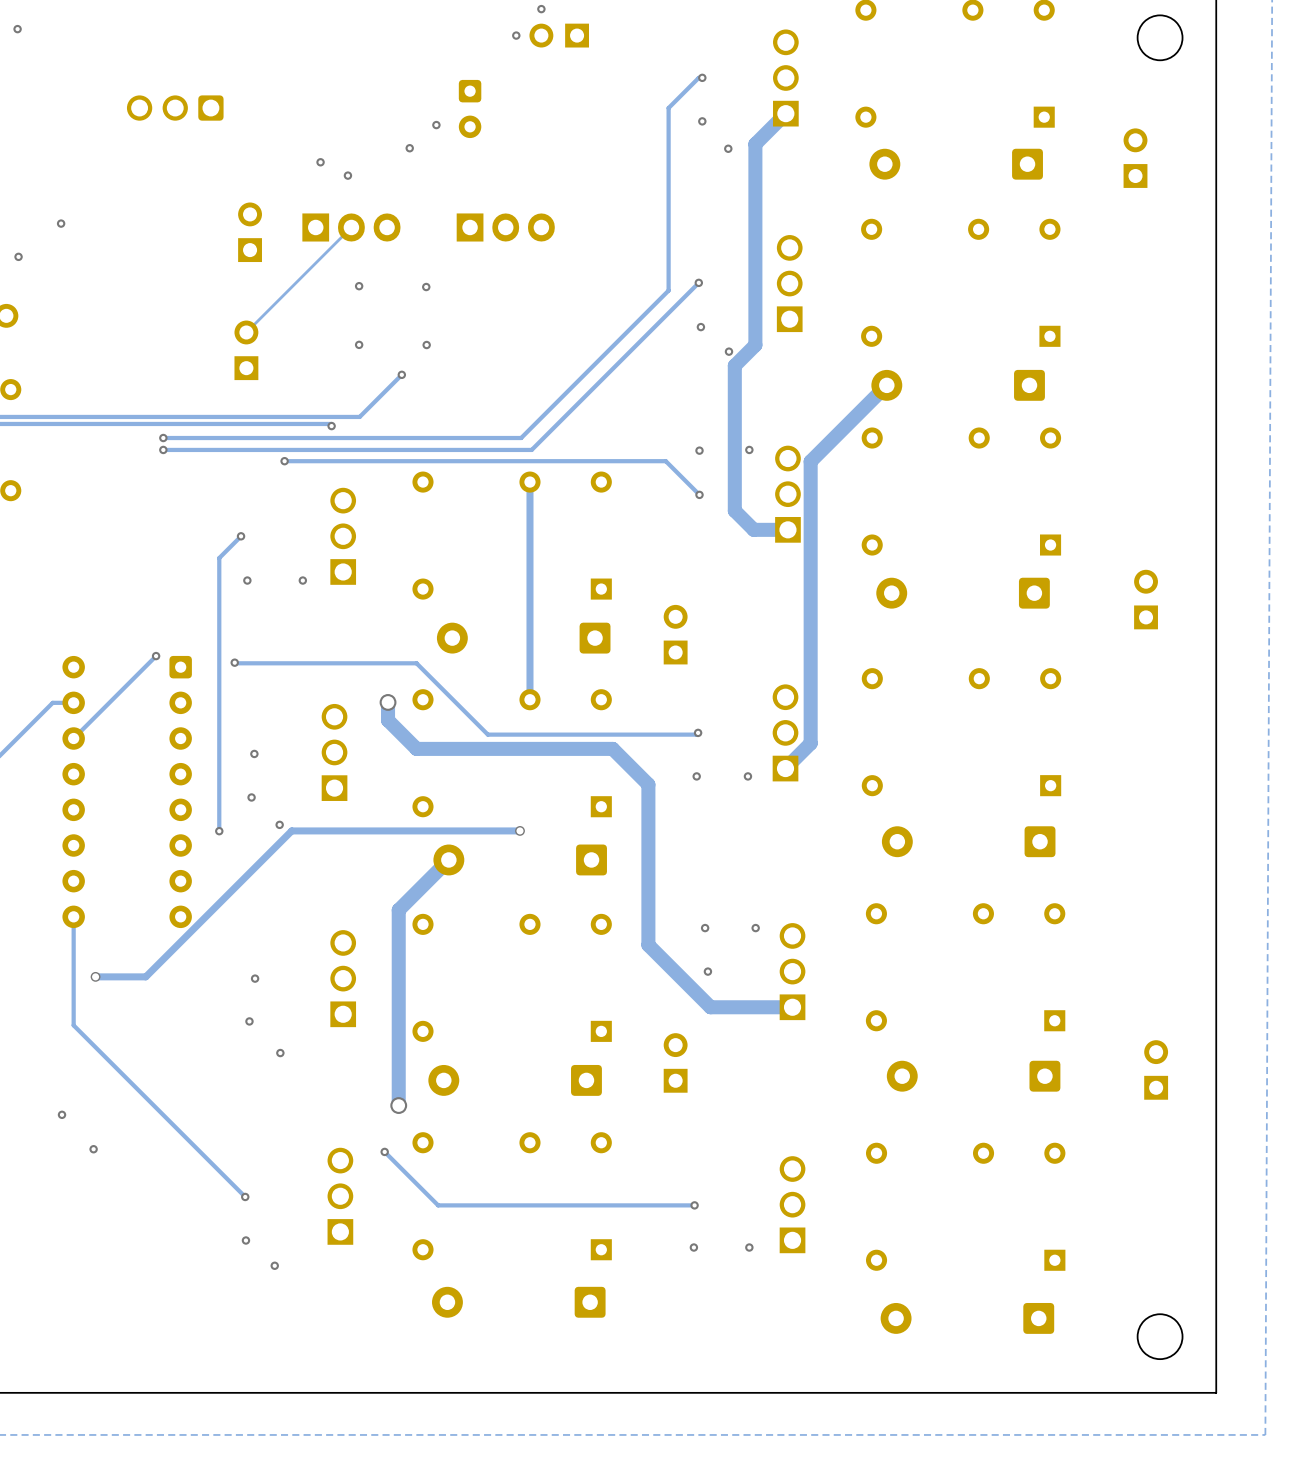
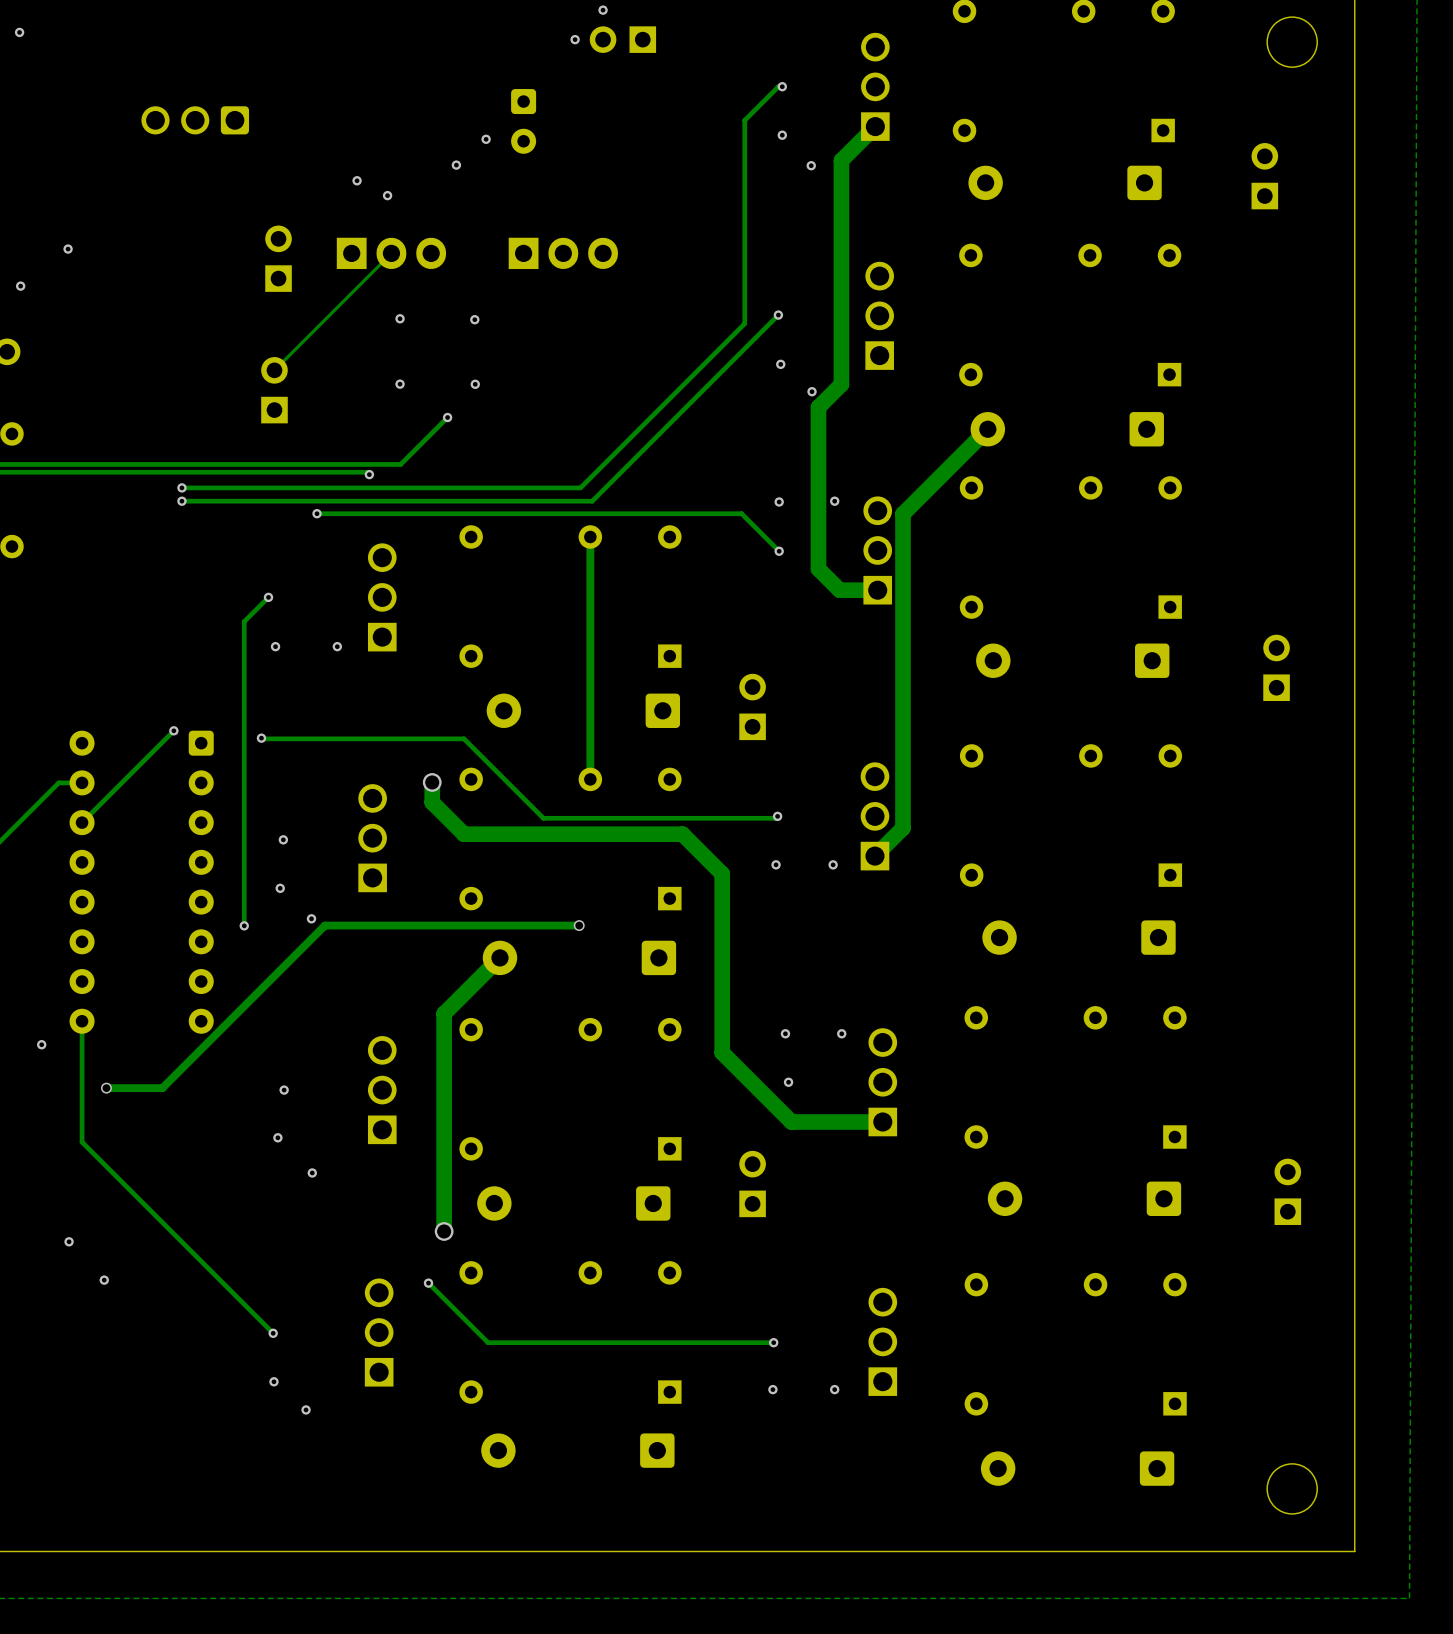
via: none -> (41, 1044)

